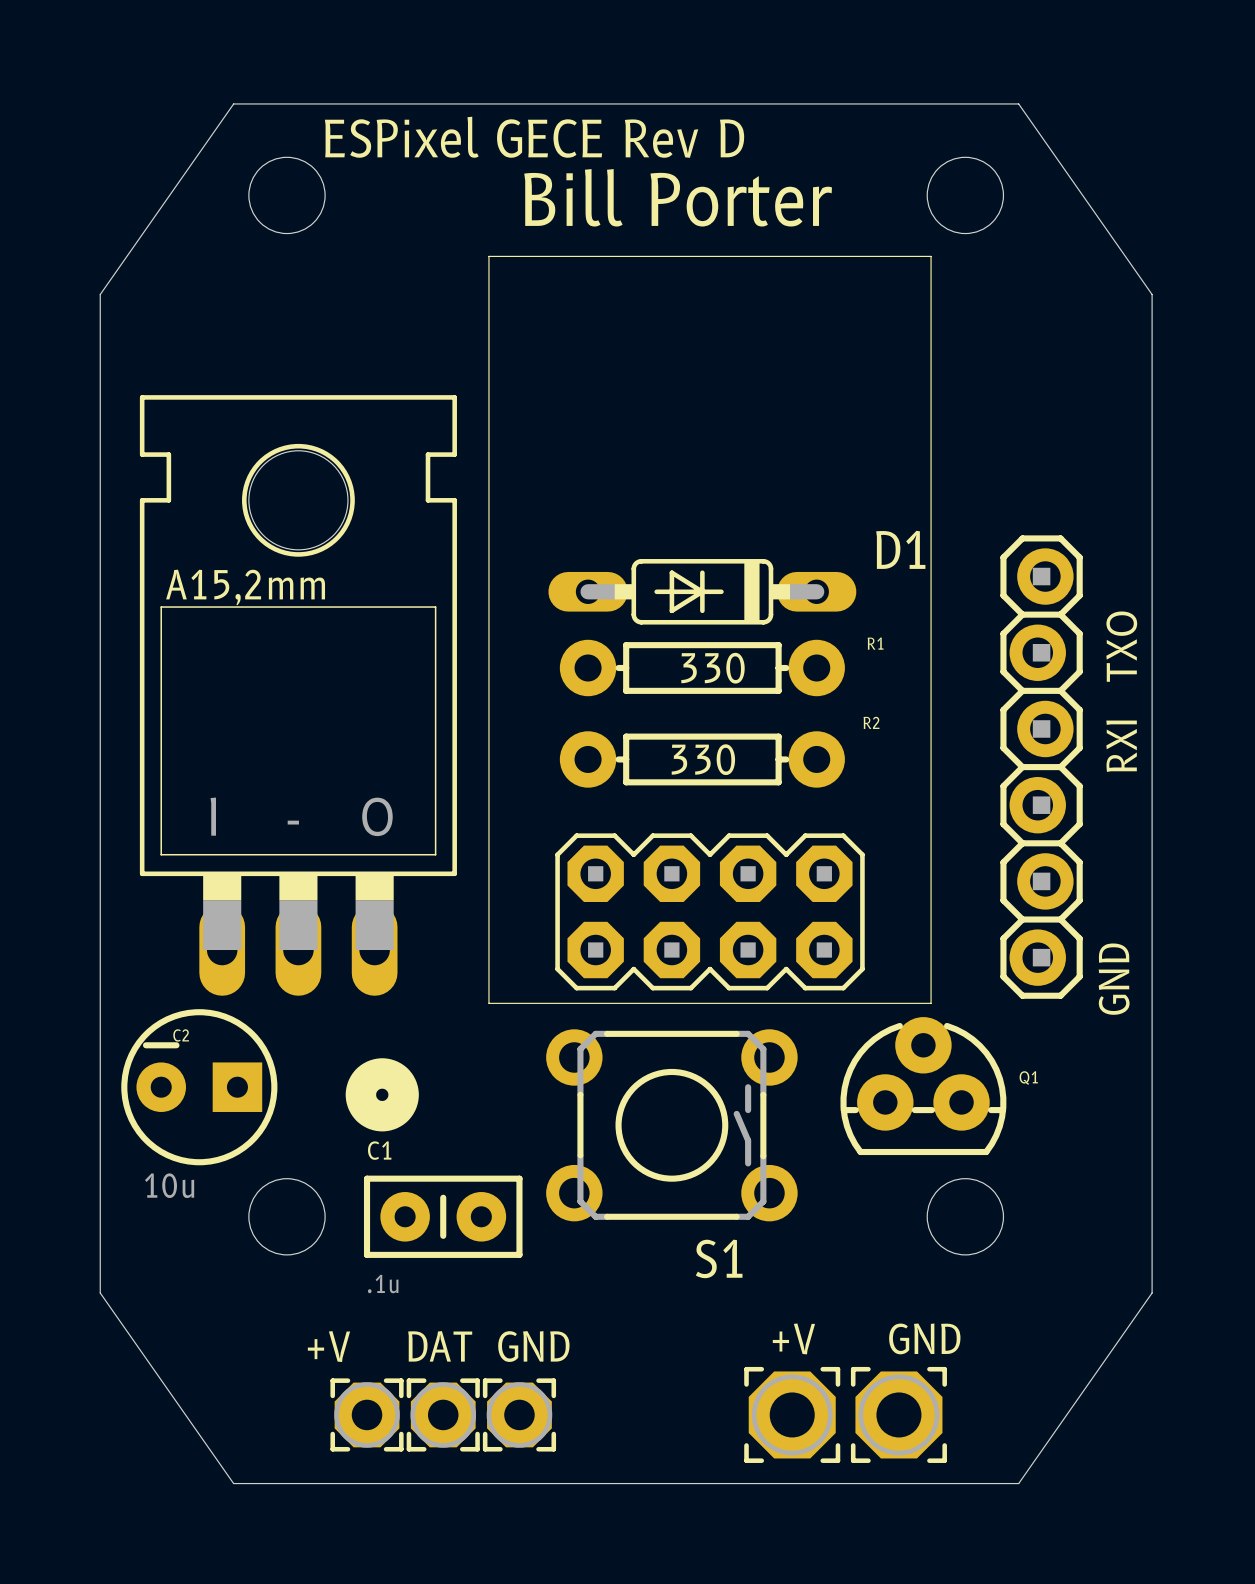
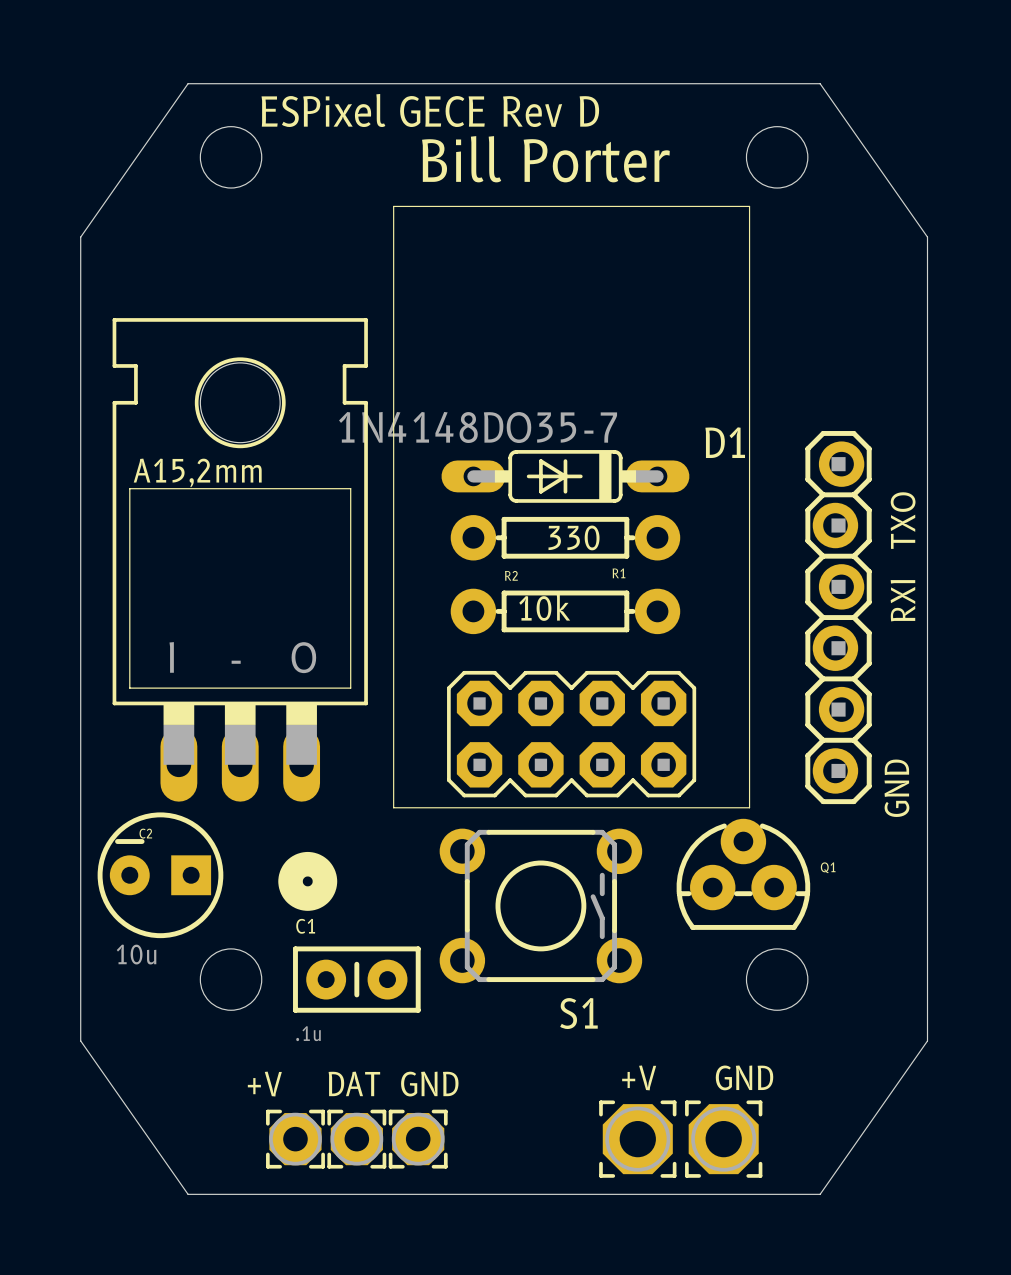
D1 value: none -> 1N4148DO35-7 (478, 427)
R1 name position: R1 (875, 643) -> R1 (618, 573)
R2 name position: R2 (871, 722) -> R2 (511, 575)
R2 value: 330 (703, 759) -> 10k (544, 607)

